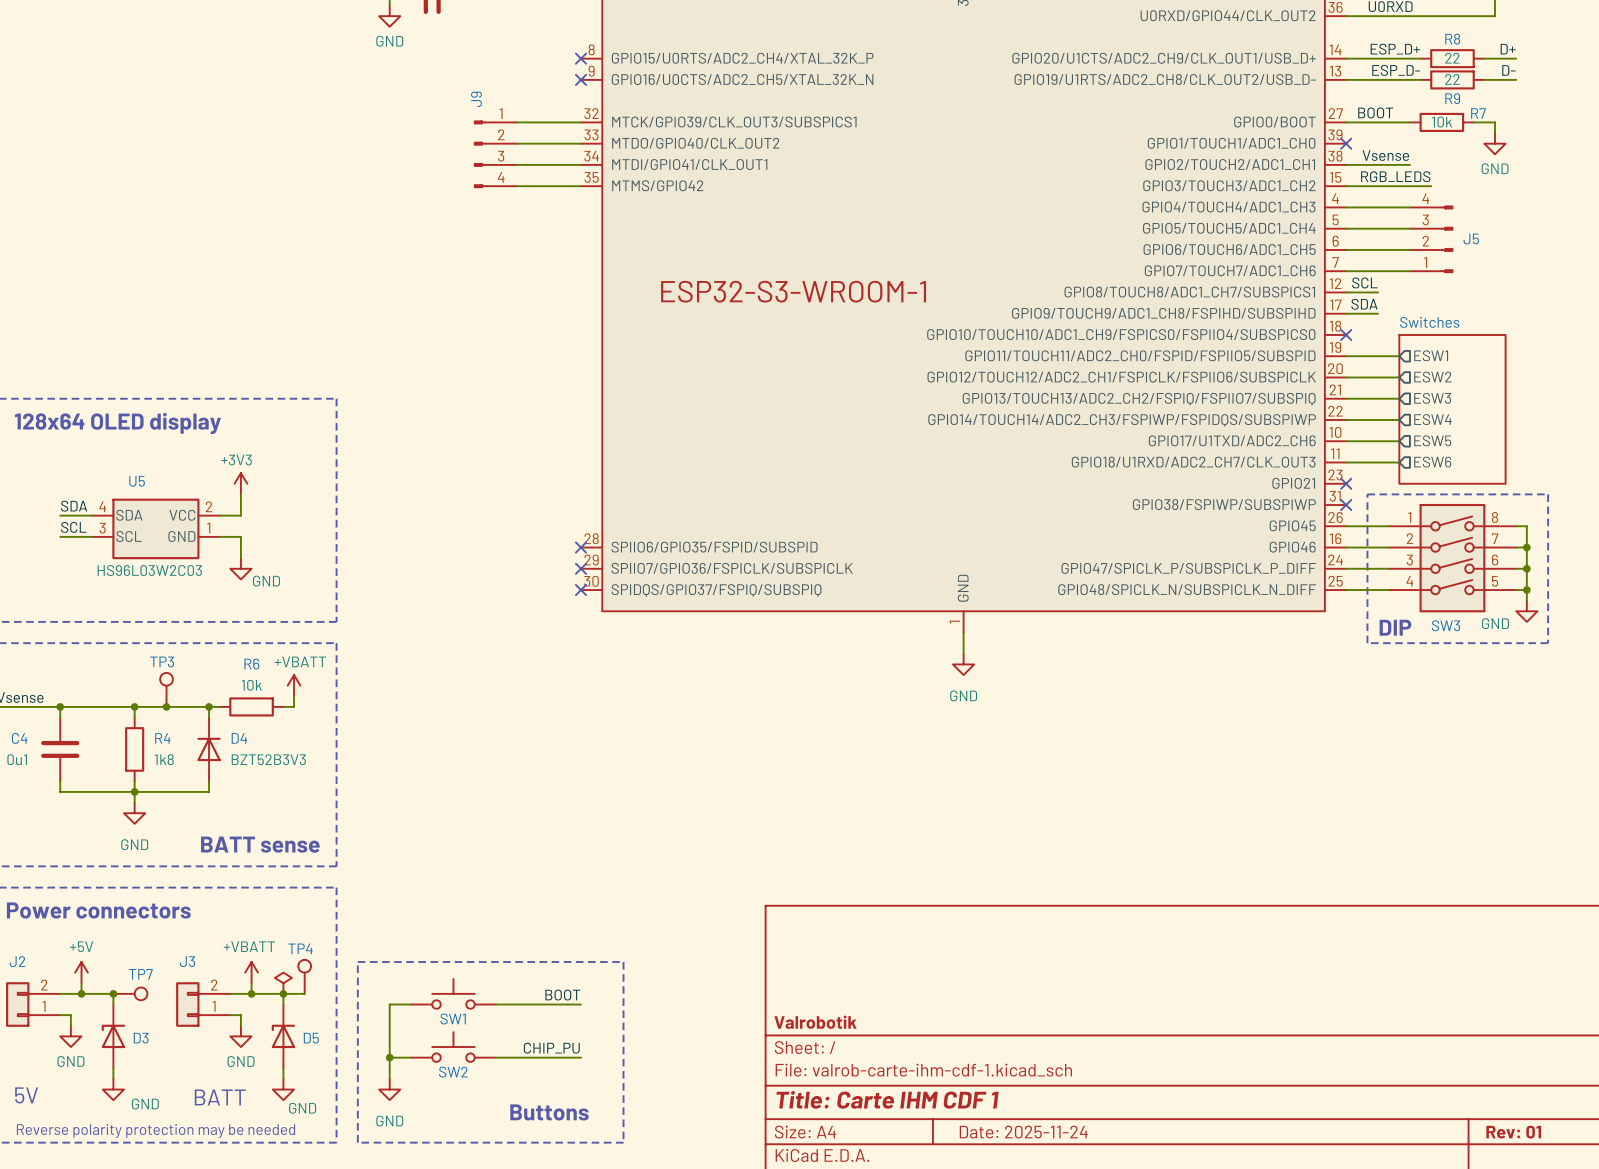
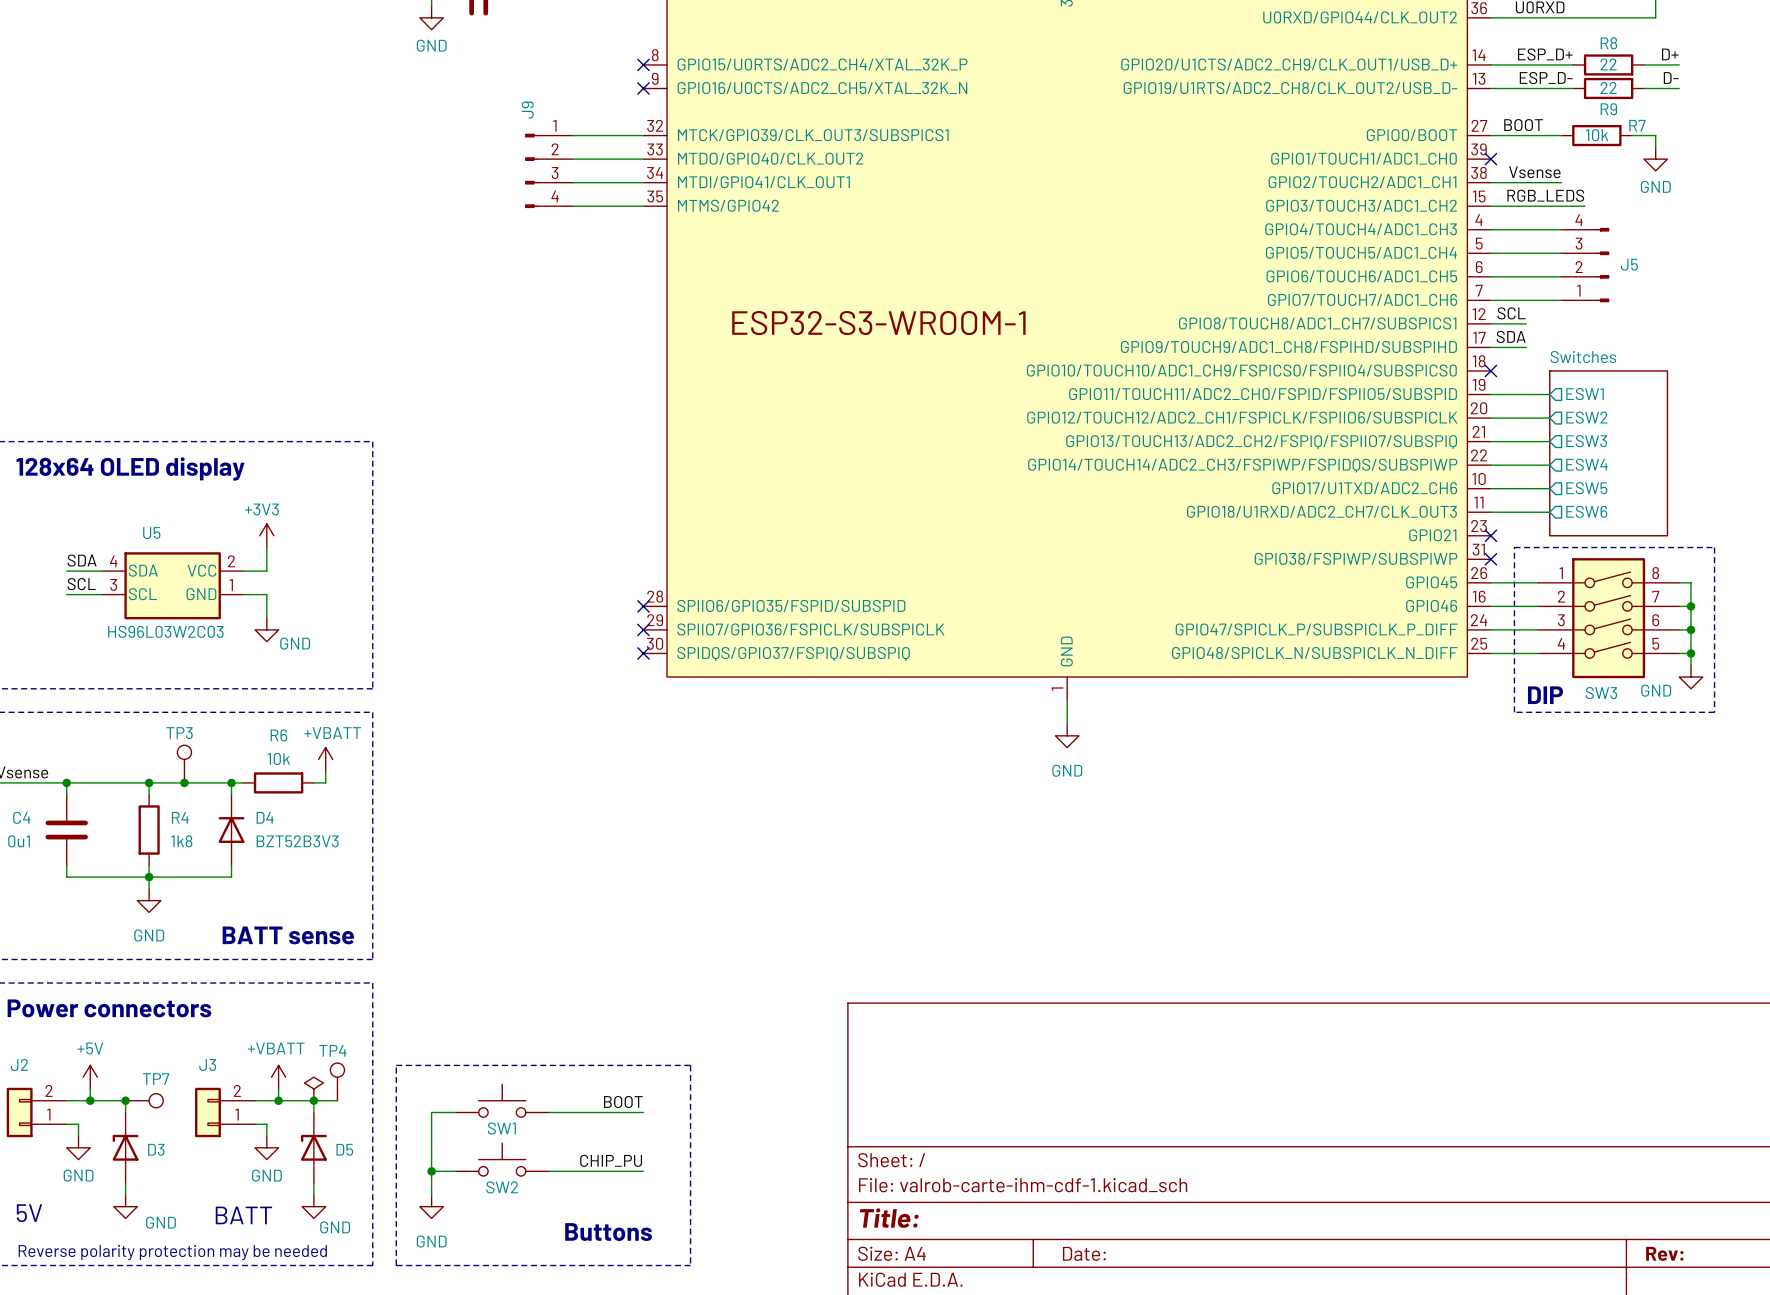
title block: Valrobotik (815, 1022) -> none
title block: Title: Carte IHM CDF 1 (887, 1099) -> Title: (889, 1218)
title block: Date: 2025-11-24 (1023, 1132) -> Date: (1084, 1253)
title block: Rev: 01 (1513, 1132) -> Rev: (1664, 1253)

